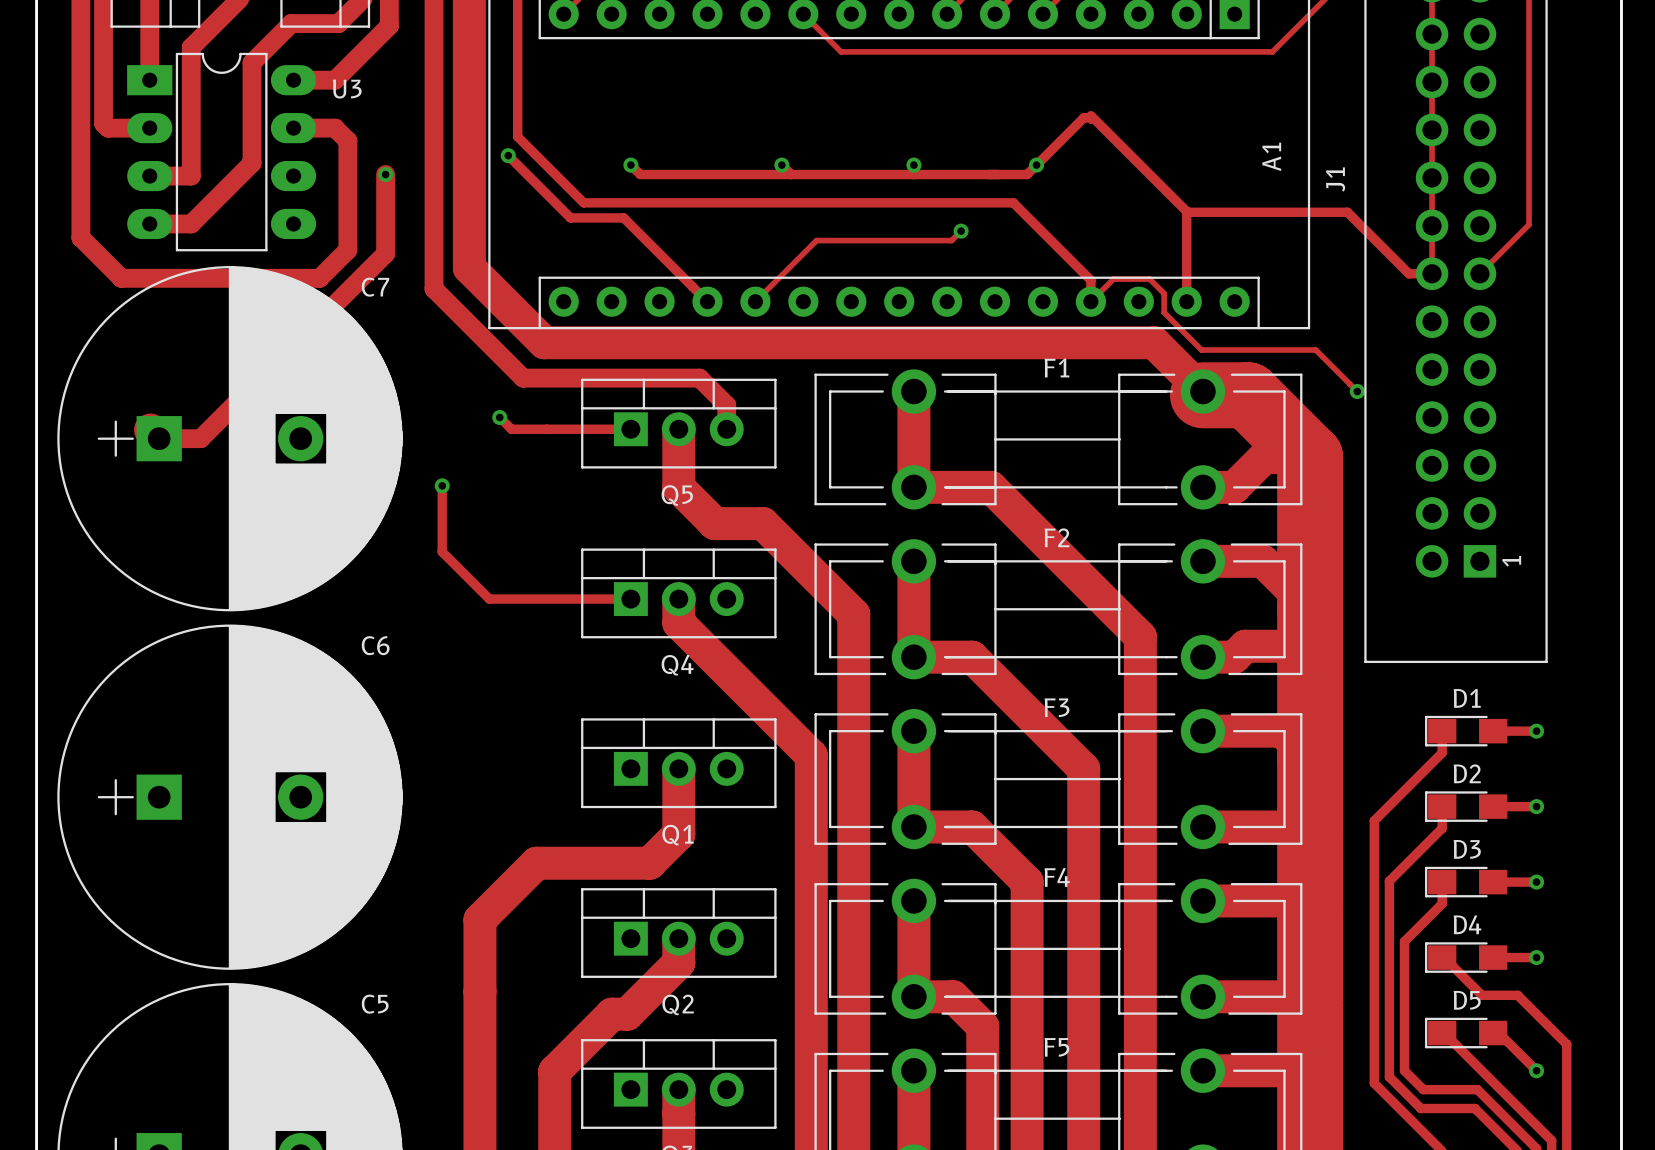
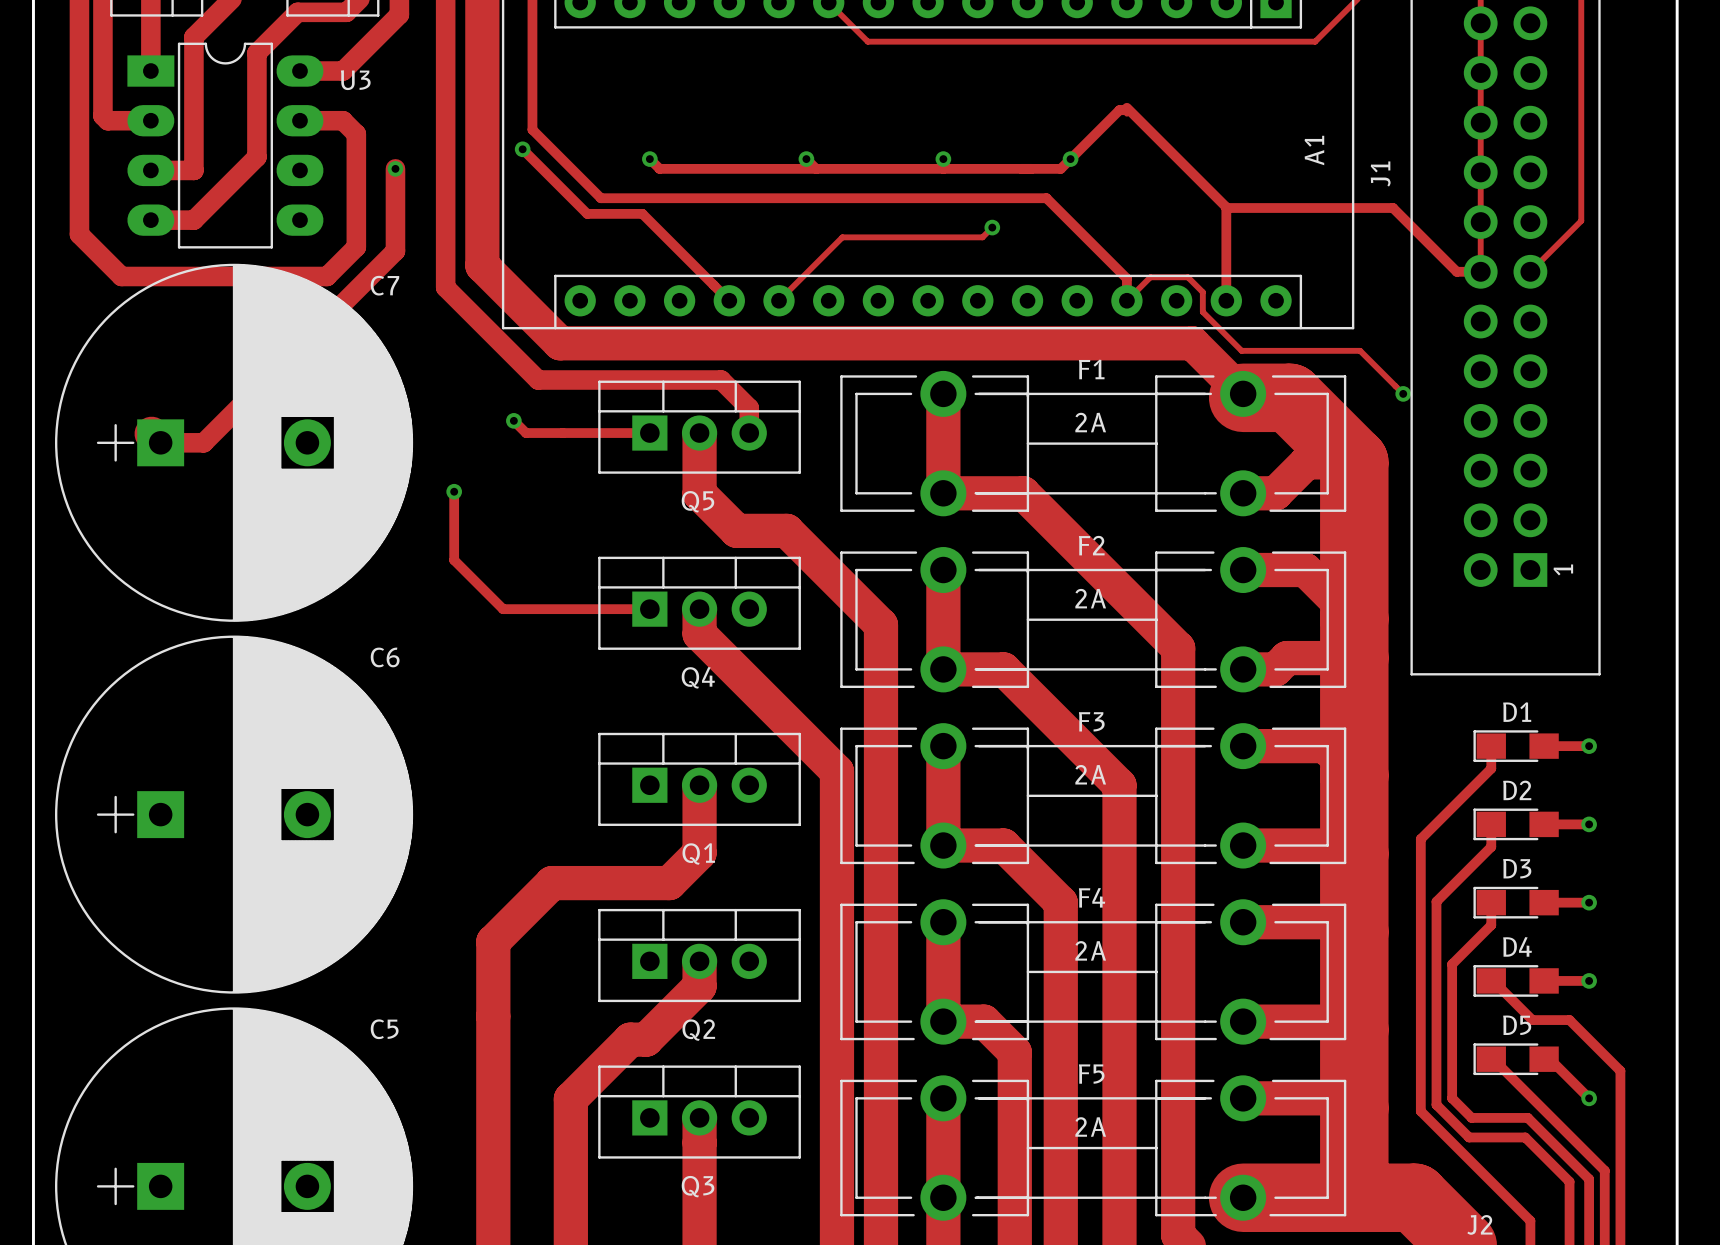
text: none -> 2A (1090, 422)
text: none -> 2A (1090, 598)
text: none -> 2A (1090, 774)
text: none -> 2A (1090, 950)
text: none -> 2A (1090, 1126)

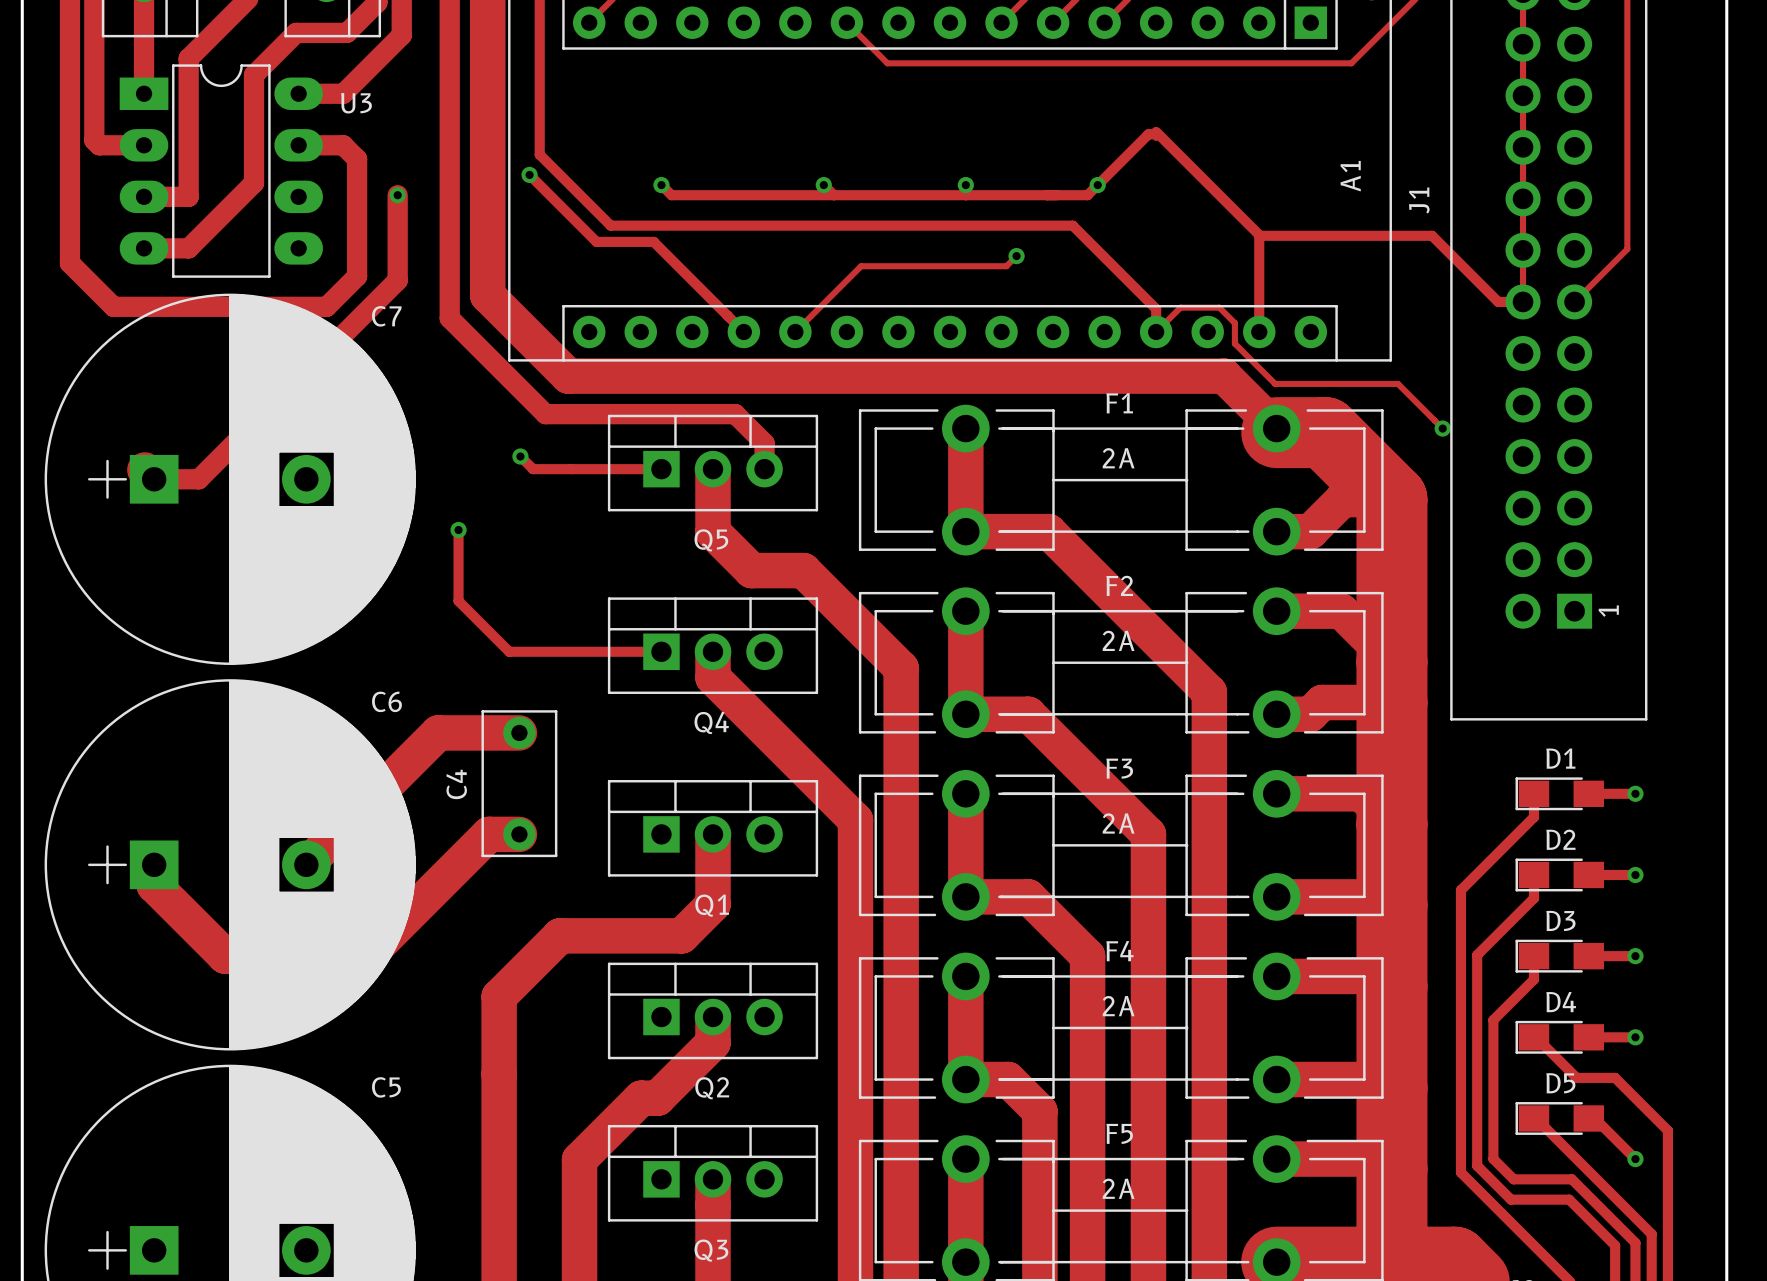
track: none -> (519, 732) (438, 732) (306, 864)
C4: none -> (519, 783)
track: none -> (519, 834) (488, 834) (367, 956) (225, 956) (154, 885) (154, 864)

